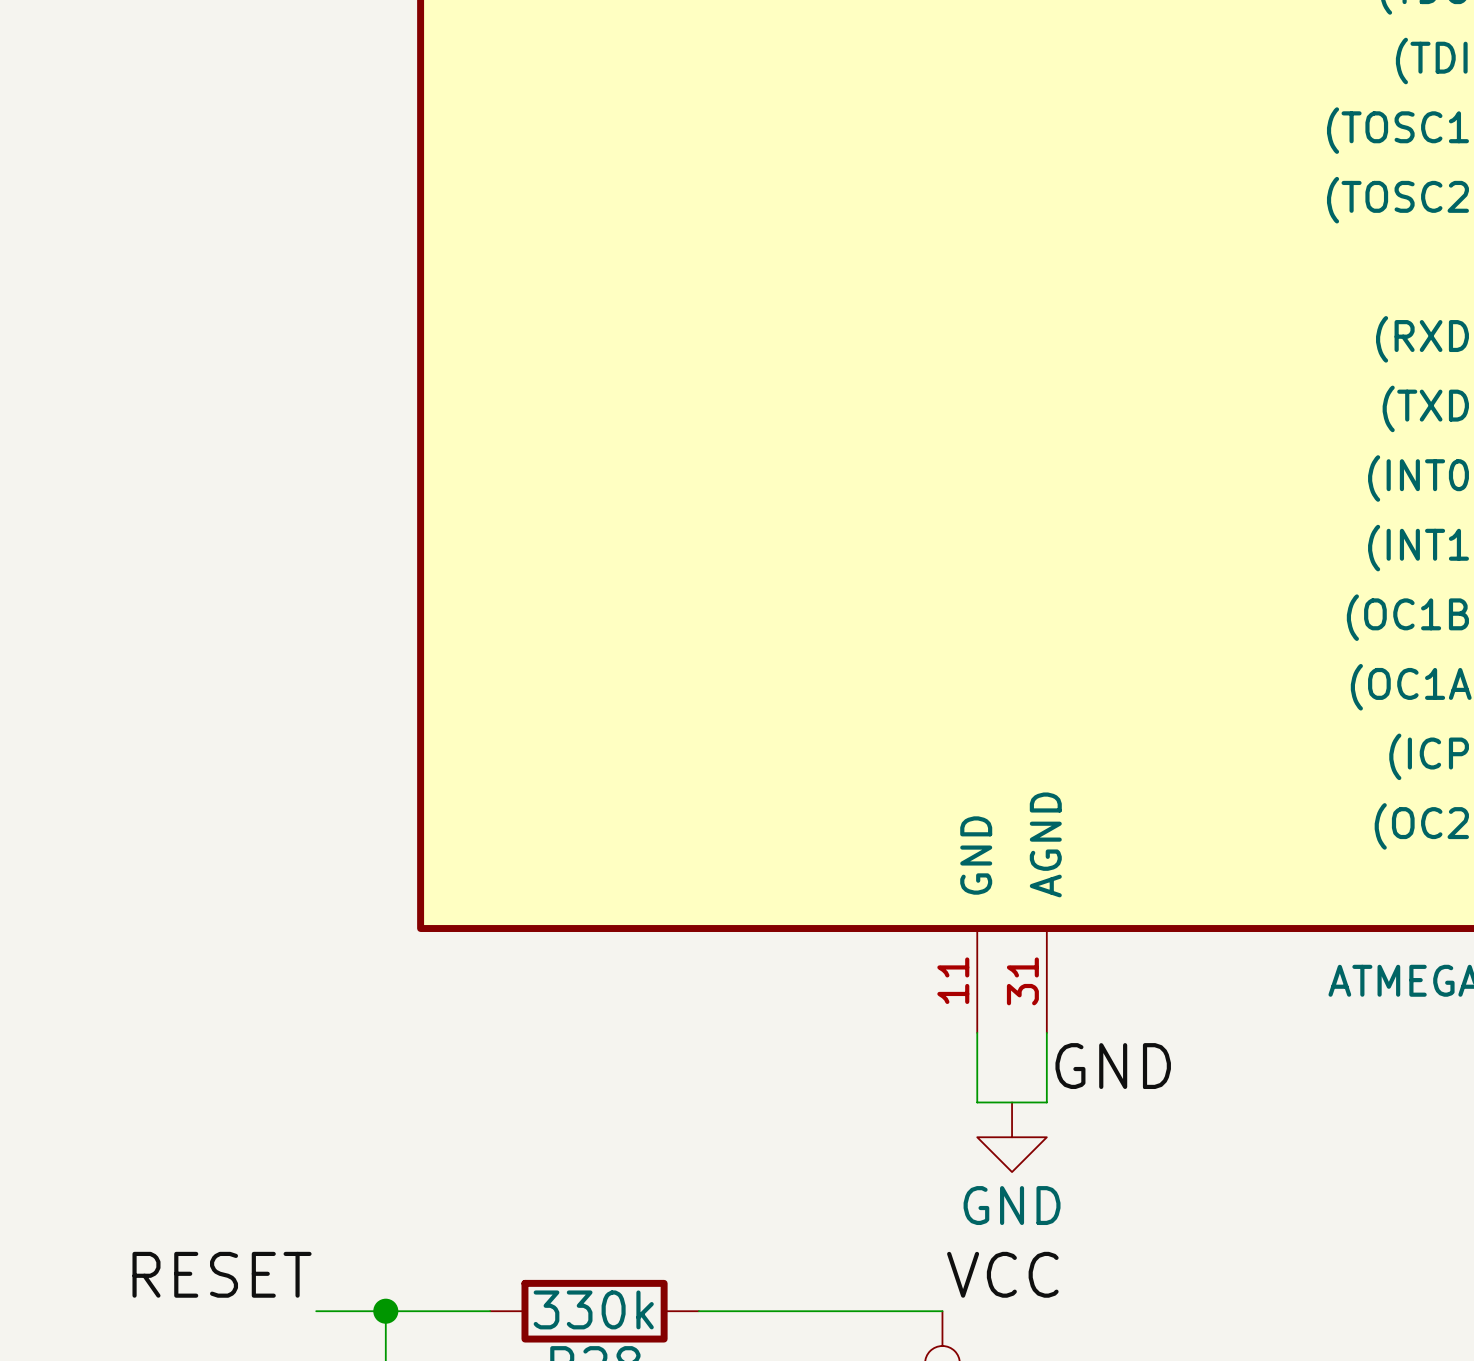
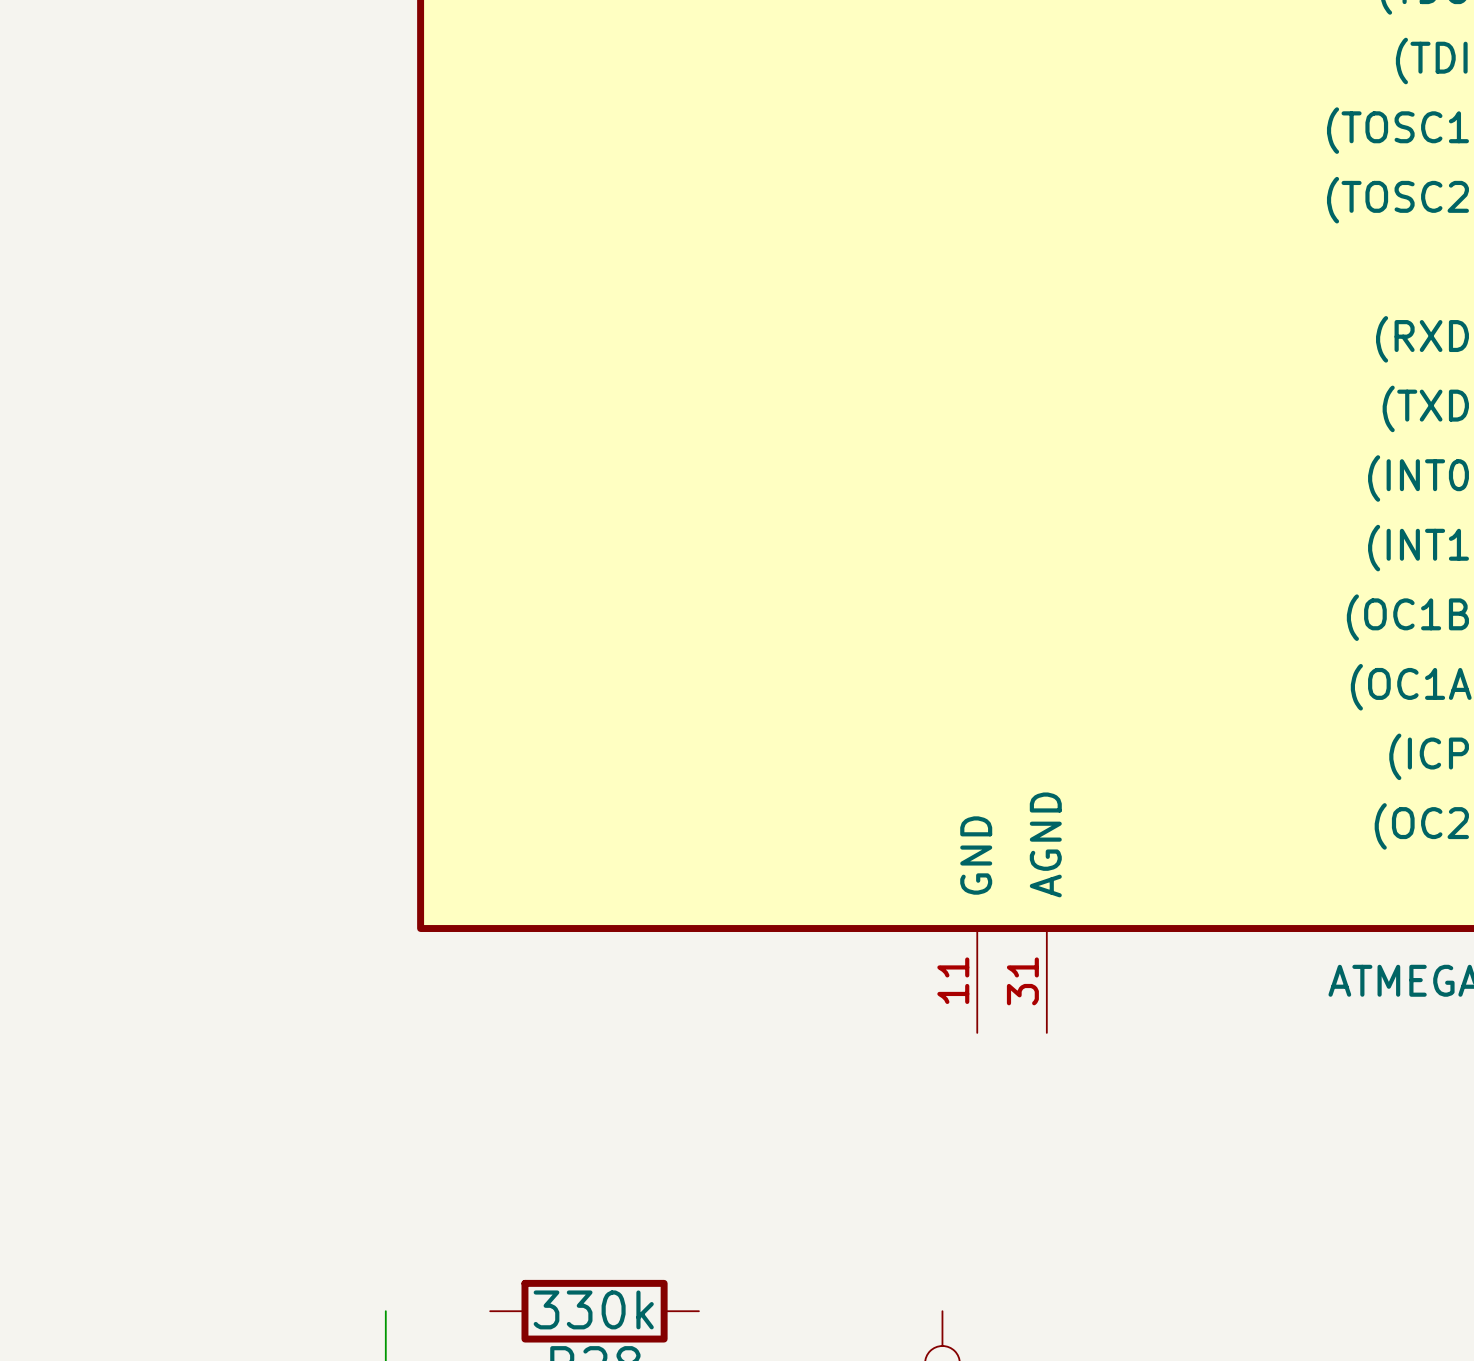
wire: (977, 1032) (977, 1102) (1046, 1102) (1046, 1032) -> none
label: GND (1113, 1066) -> none
power symbol: GND (1012, 1137) -> none
label: RESET (222, 1274) -> none
label: VCC (1002, 1274) -> none
wire: (316, 1311) (490, 1311) -> none
junction: (385, 1311) -> none
wire: (698, 1311) (942, 1311) -> none

